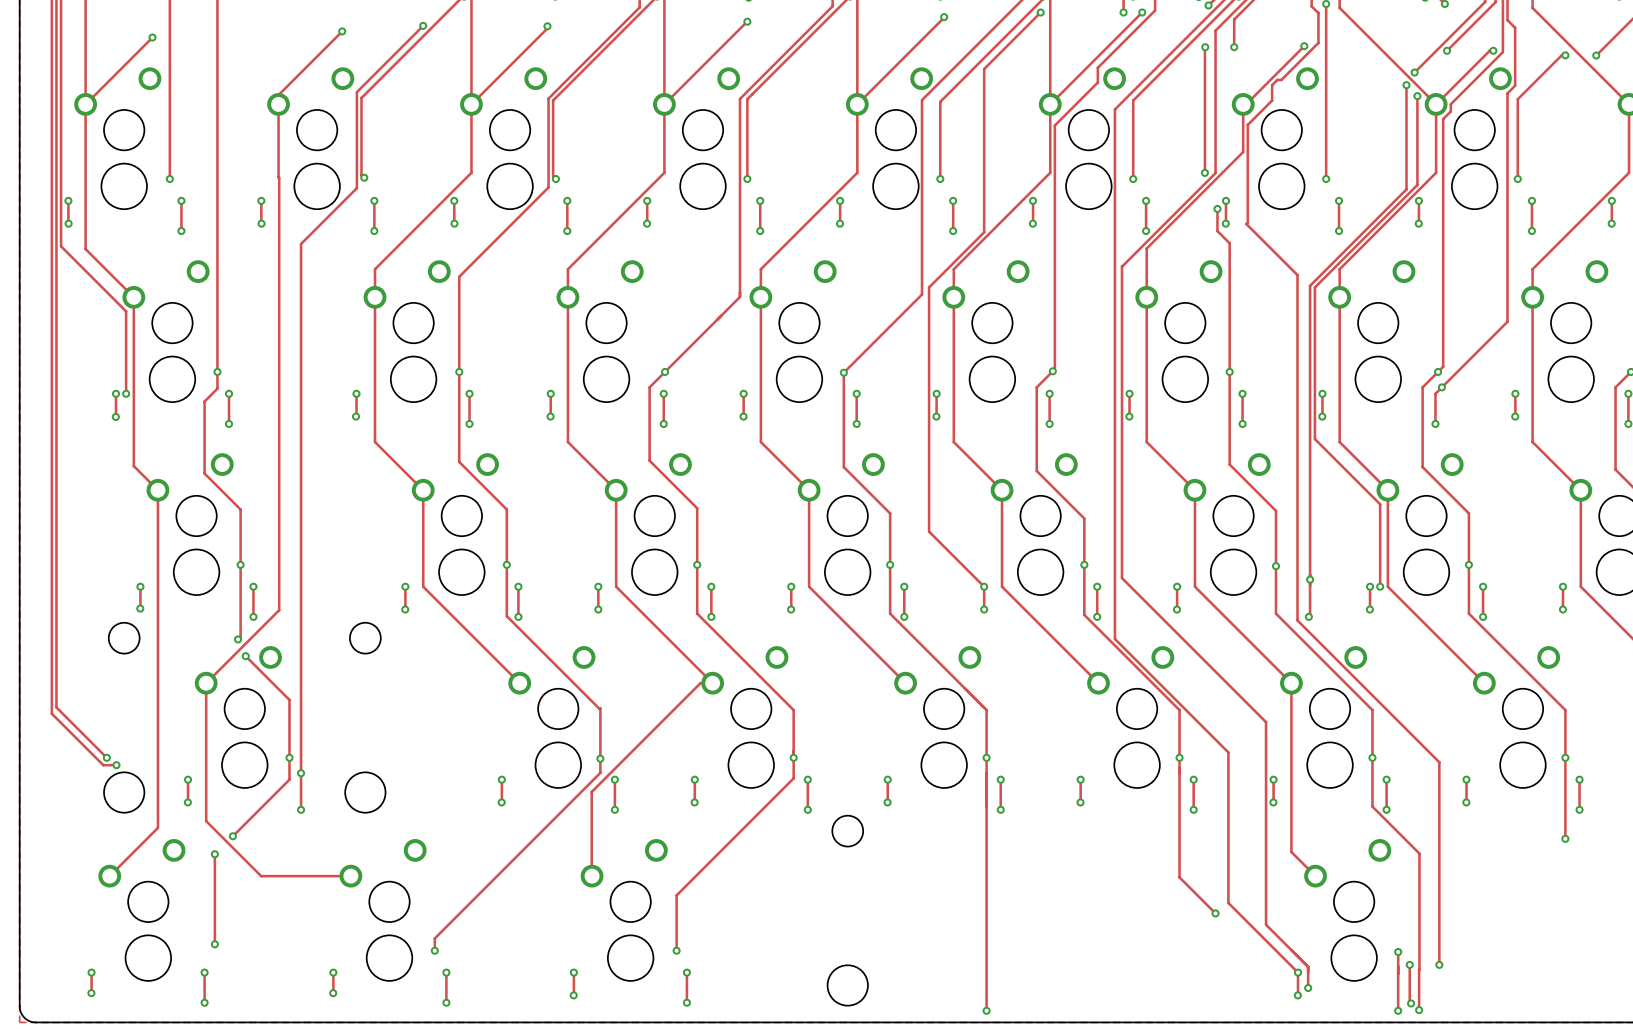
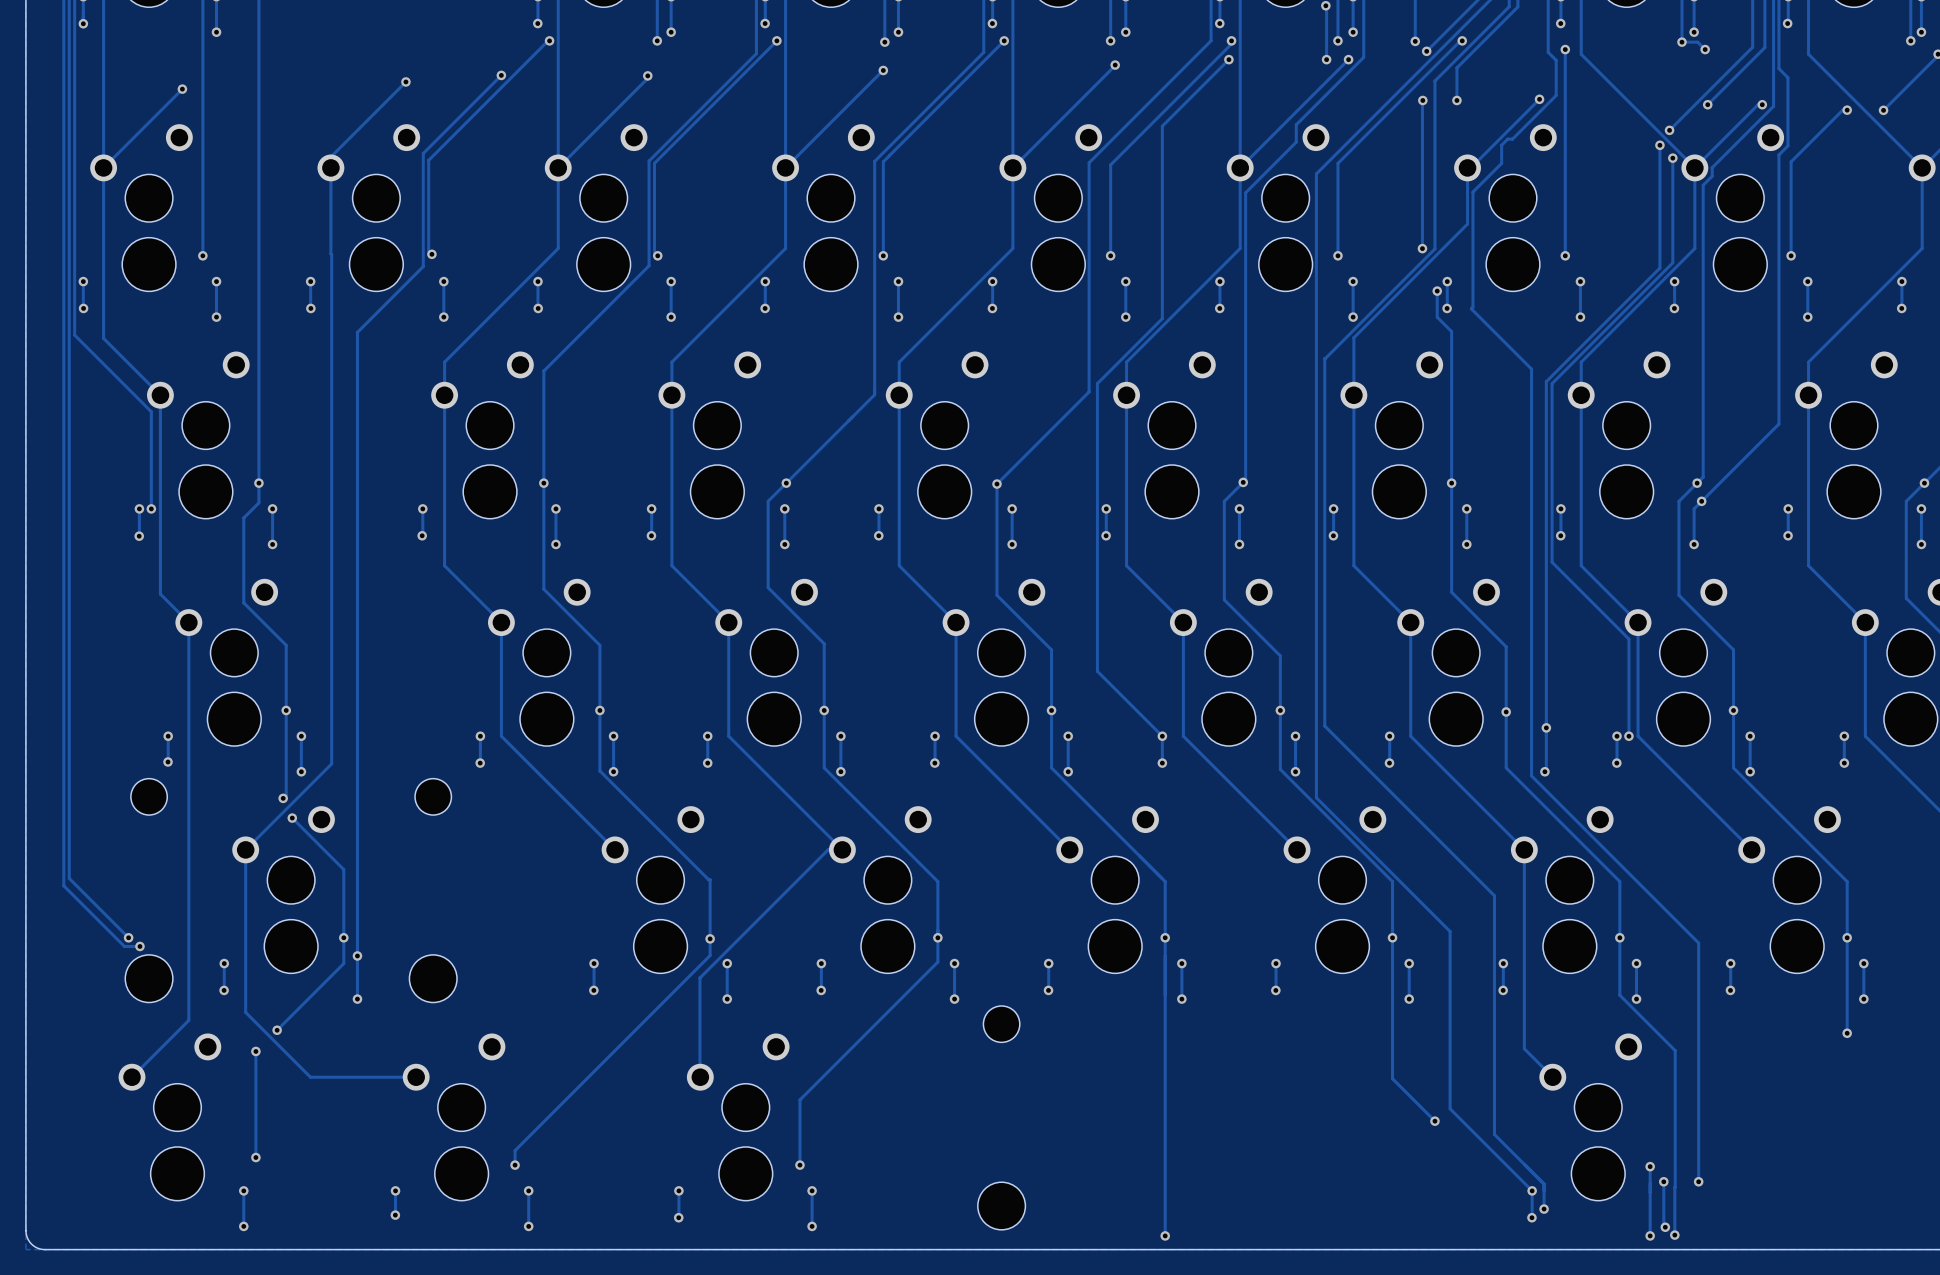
track: (91, 972) (91, 993) -> none
via: (91, 972) -> none
via: (91, 993) -> none

